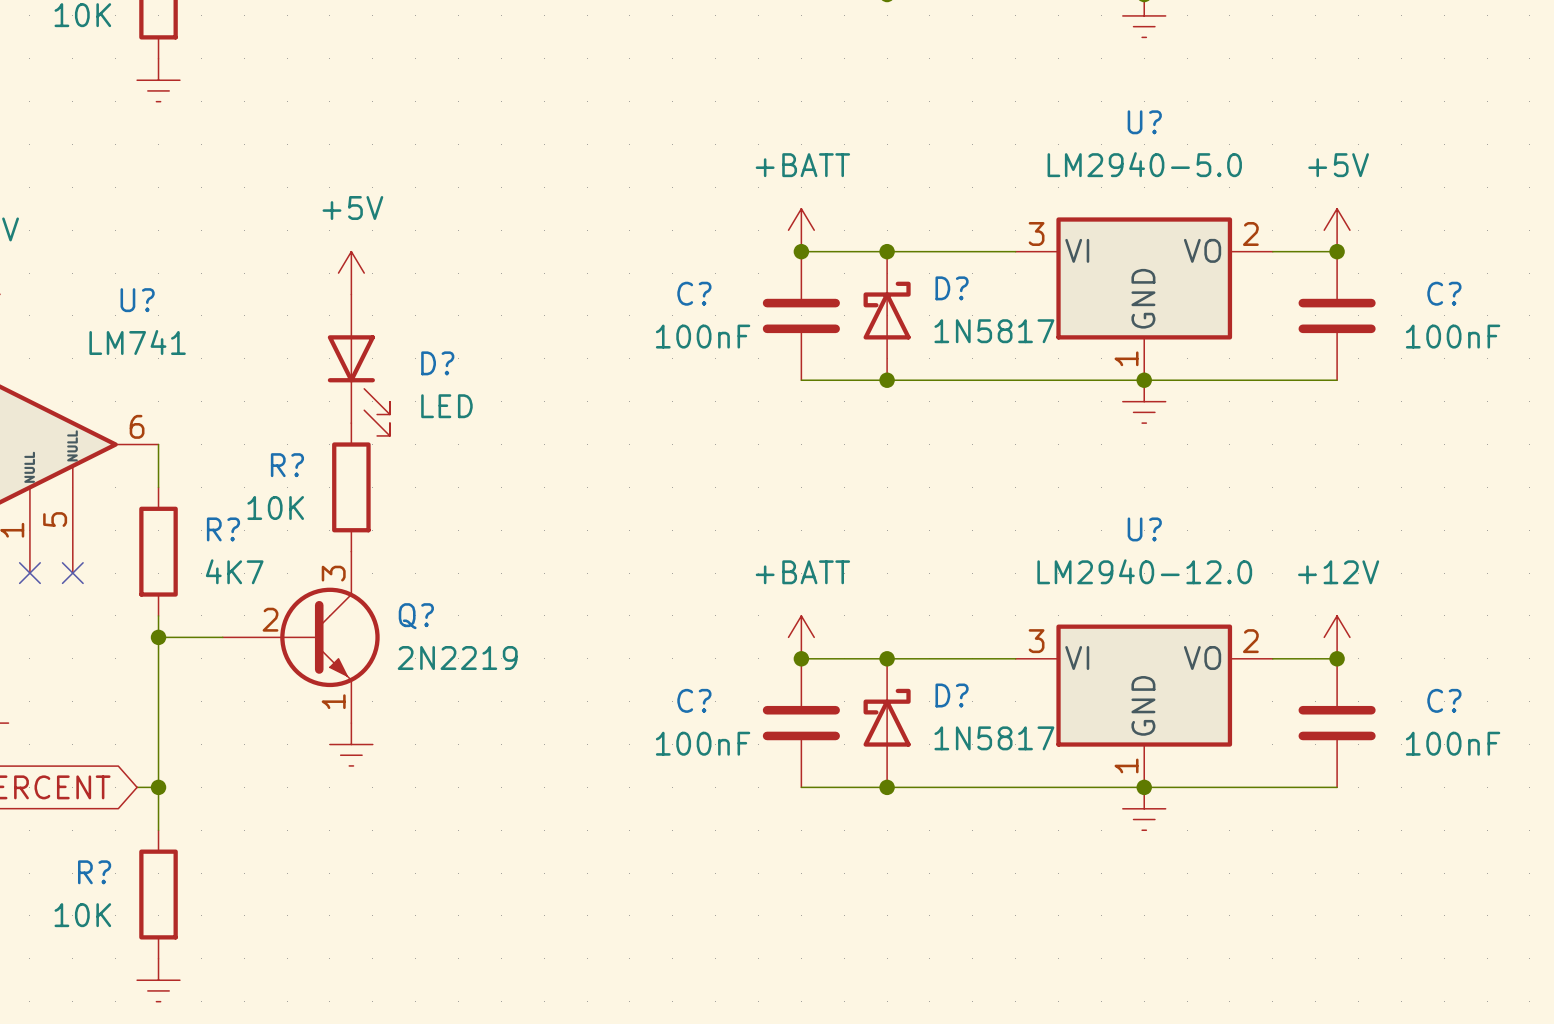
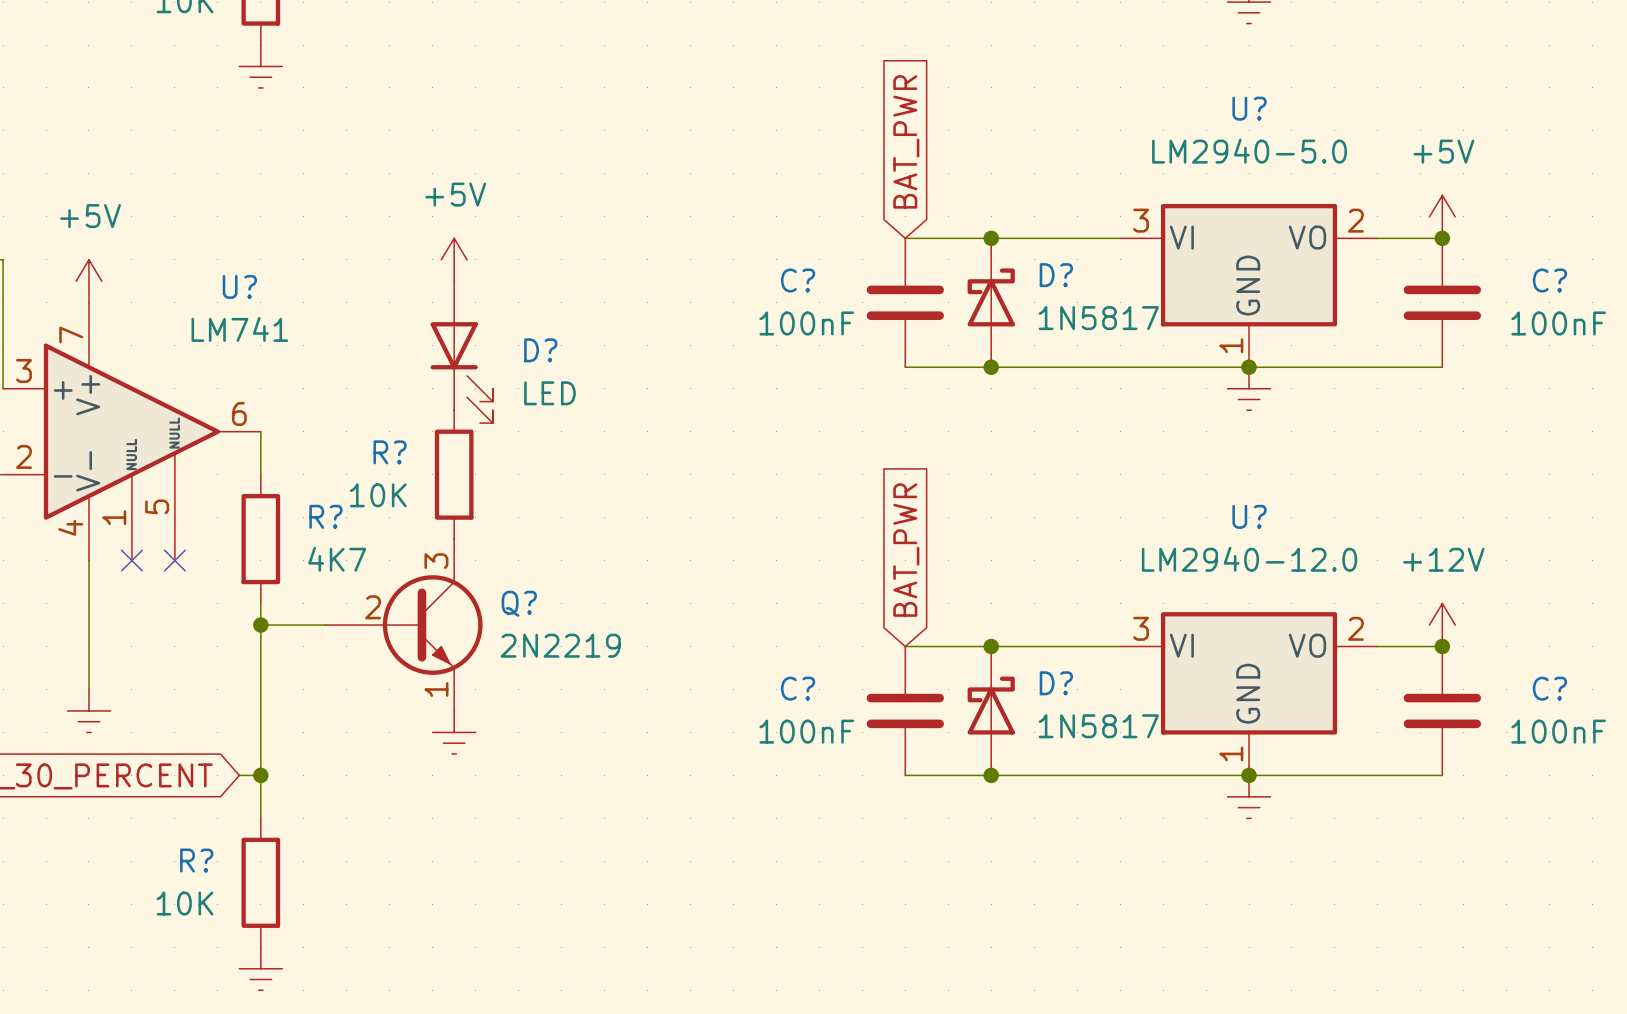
global label: none -> BAT_PWR (906, 141)
power symbol: +BATT (801, 230) -> none
junction: (801, 251) -> none
global label: none -> BAT_PWR (906, 550)
power symbol: +BATT (801, 637) -> none
junction: (801, 658) -> none

